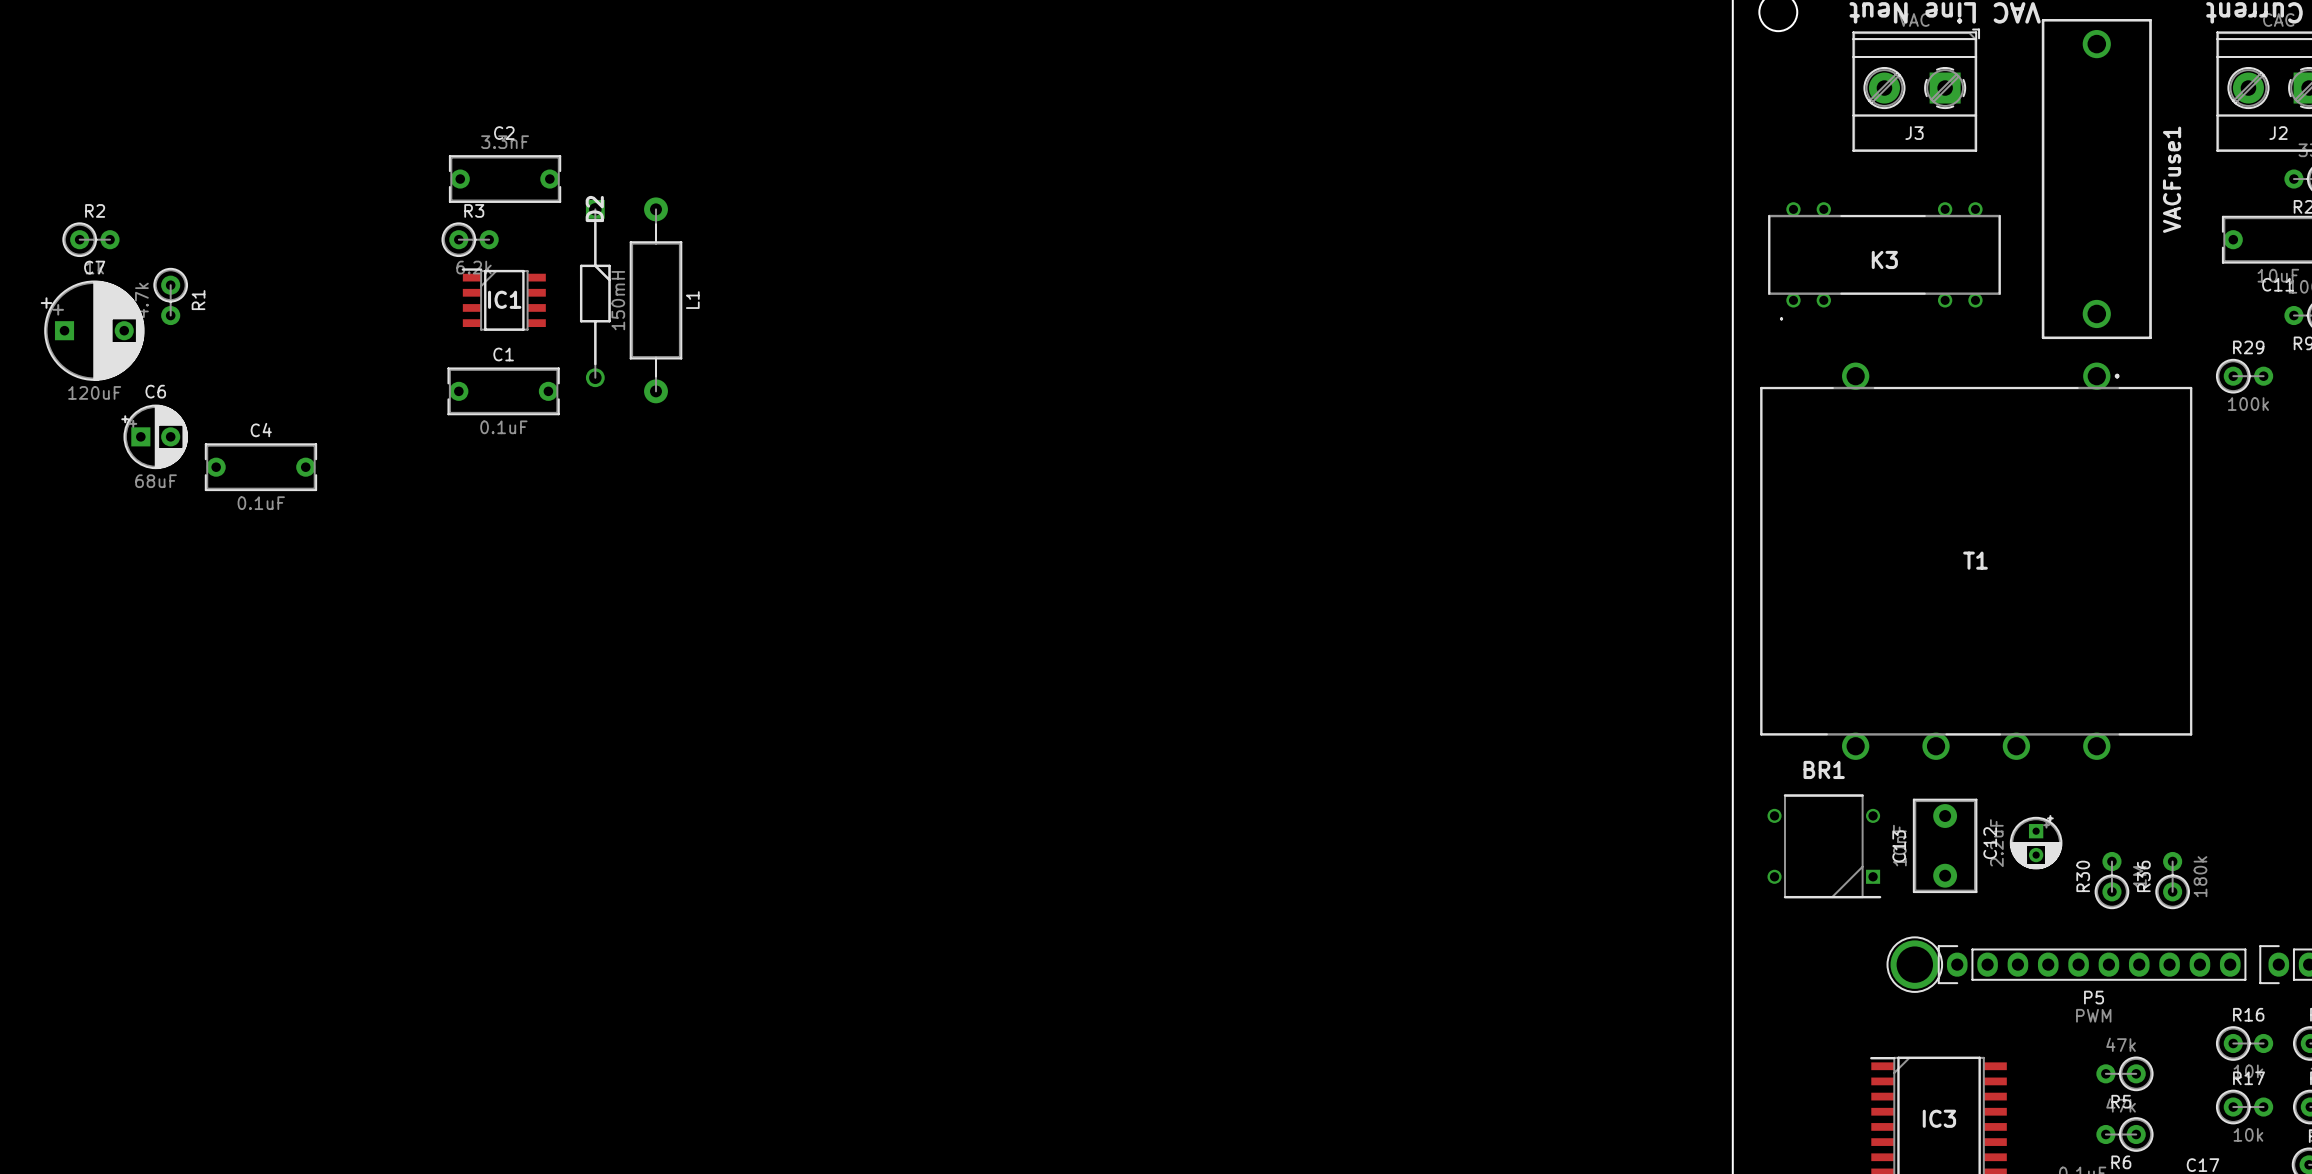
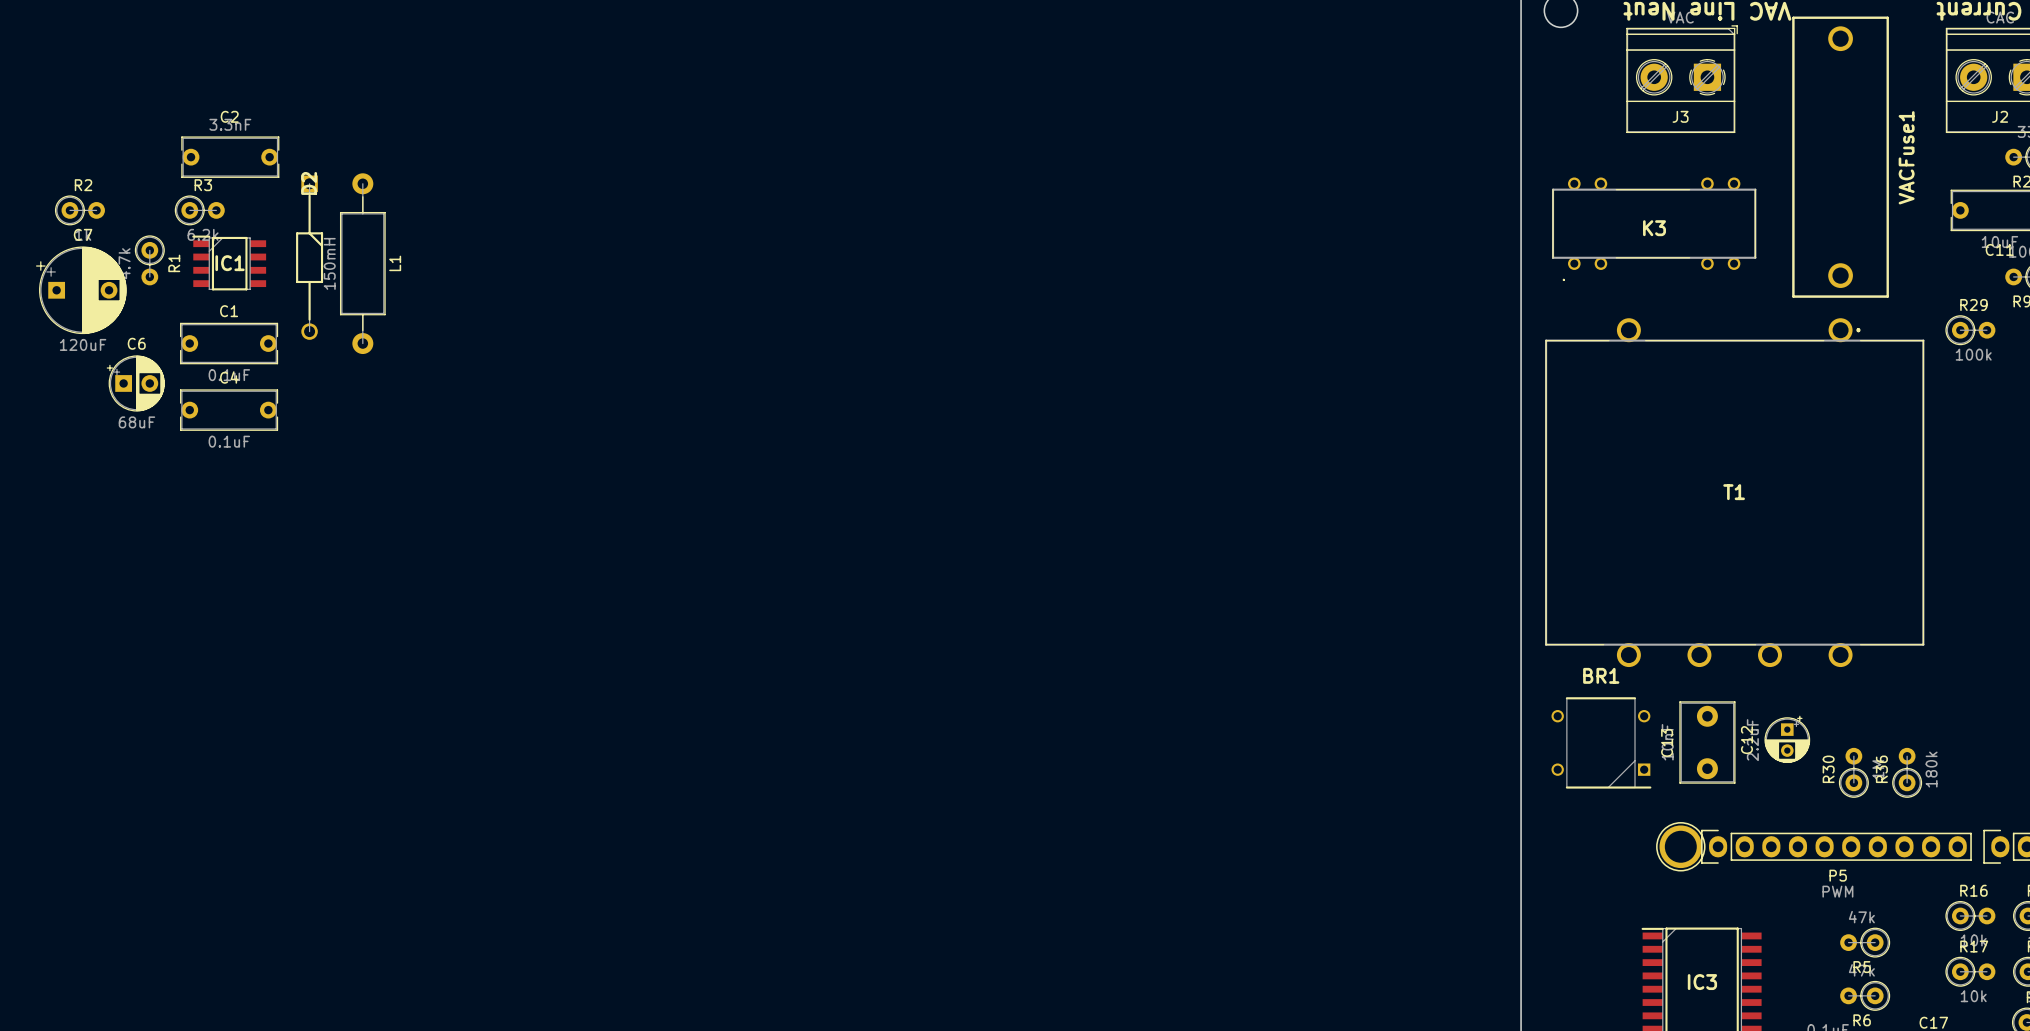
C2 position: (505, 179) -> (230, 157)
R3 position: (470, 239) -> (199, 210)
D2 position: (595, 293) -> (309, 257)
IC1 position: (503, 299) -> (229, 262)
L1 position: (656, 300) -> (362, 263)
C1 position: (503, 391) -> (229, 343)

